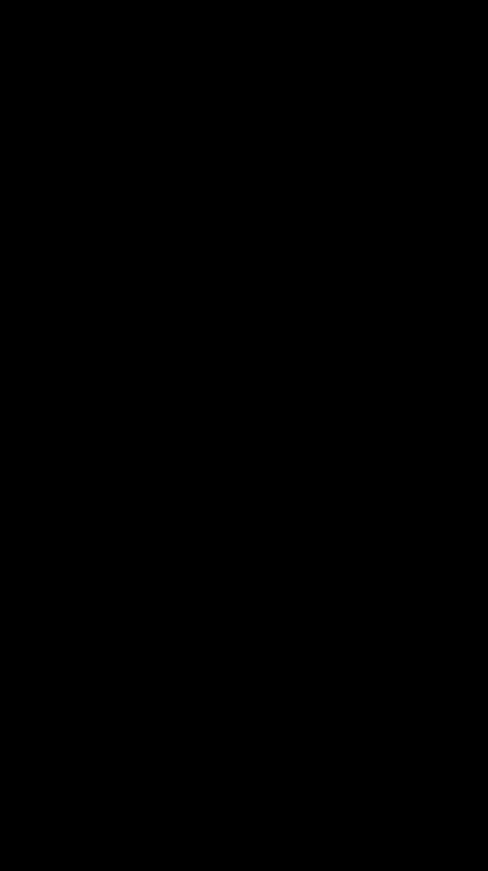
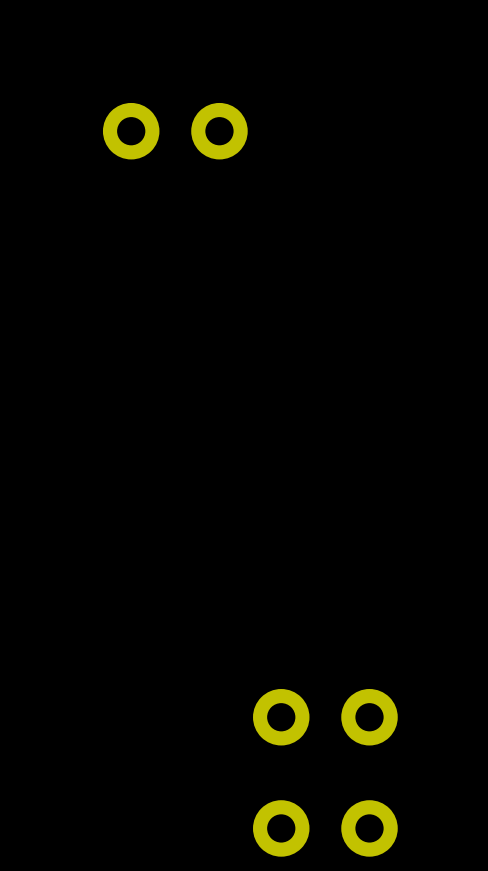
part: none -> (175, 131)
part: none -> (325, 717)
part: none -> (325, 828)

